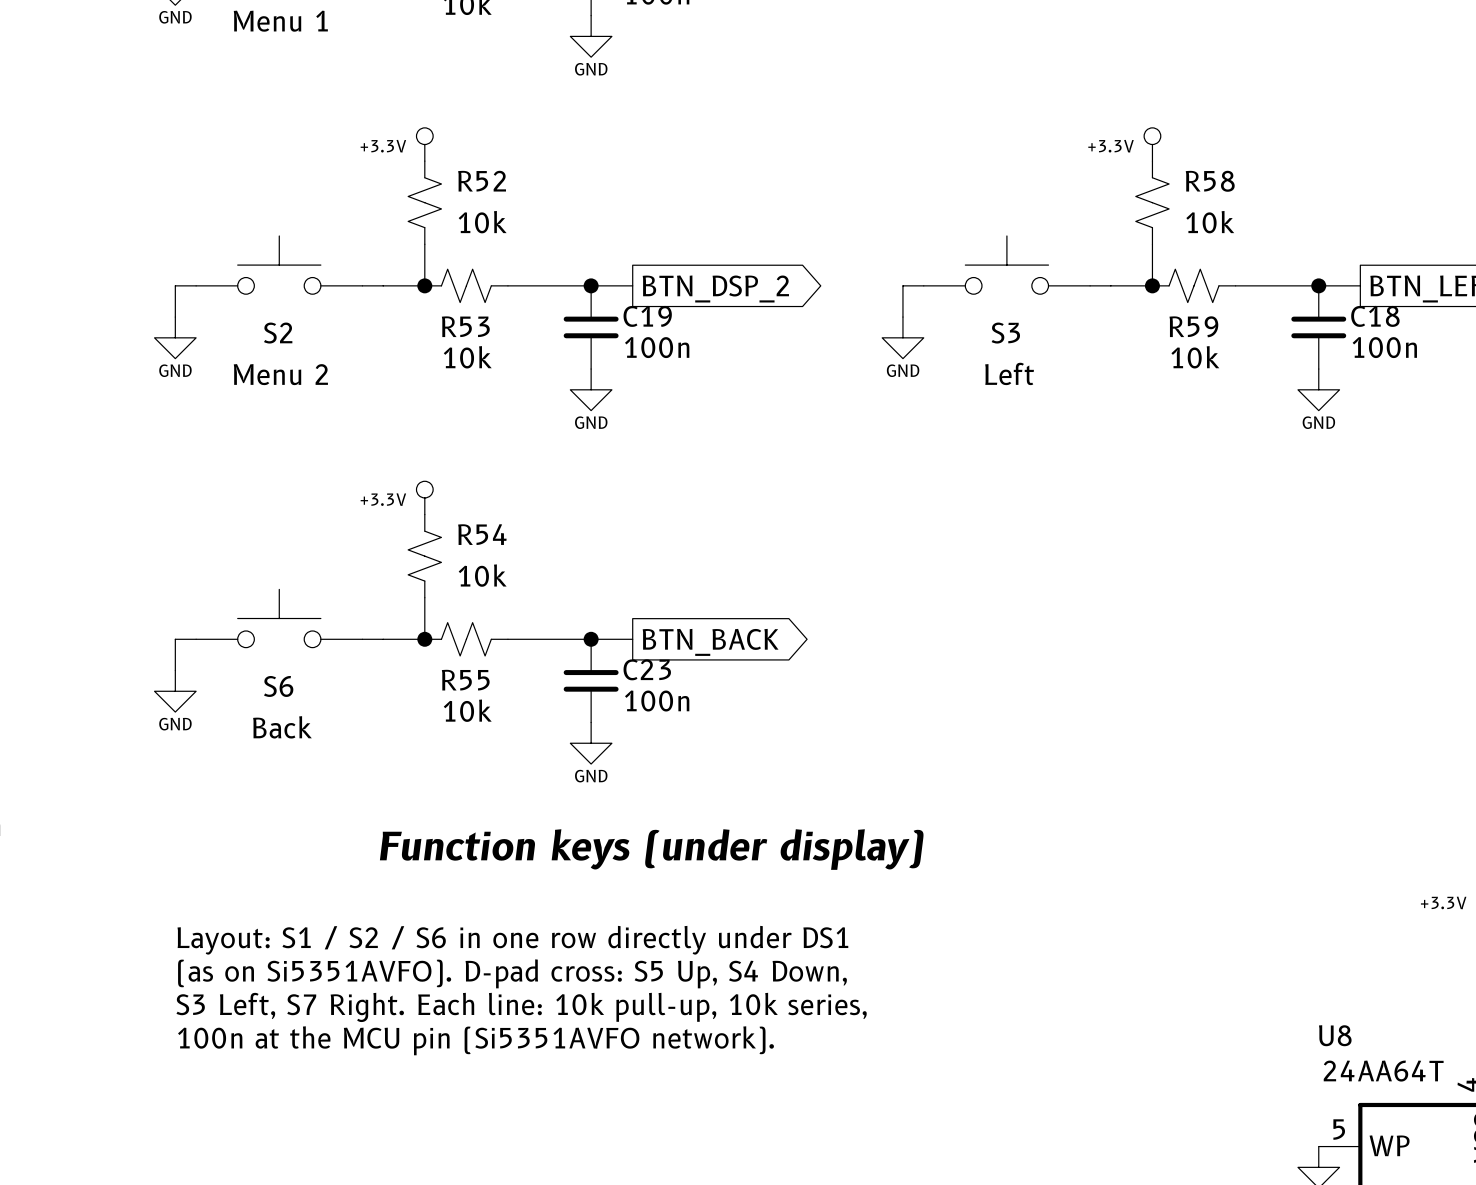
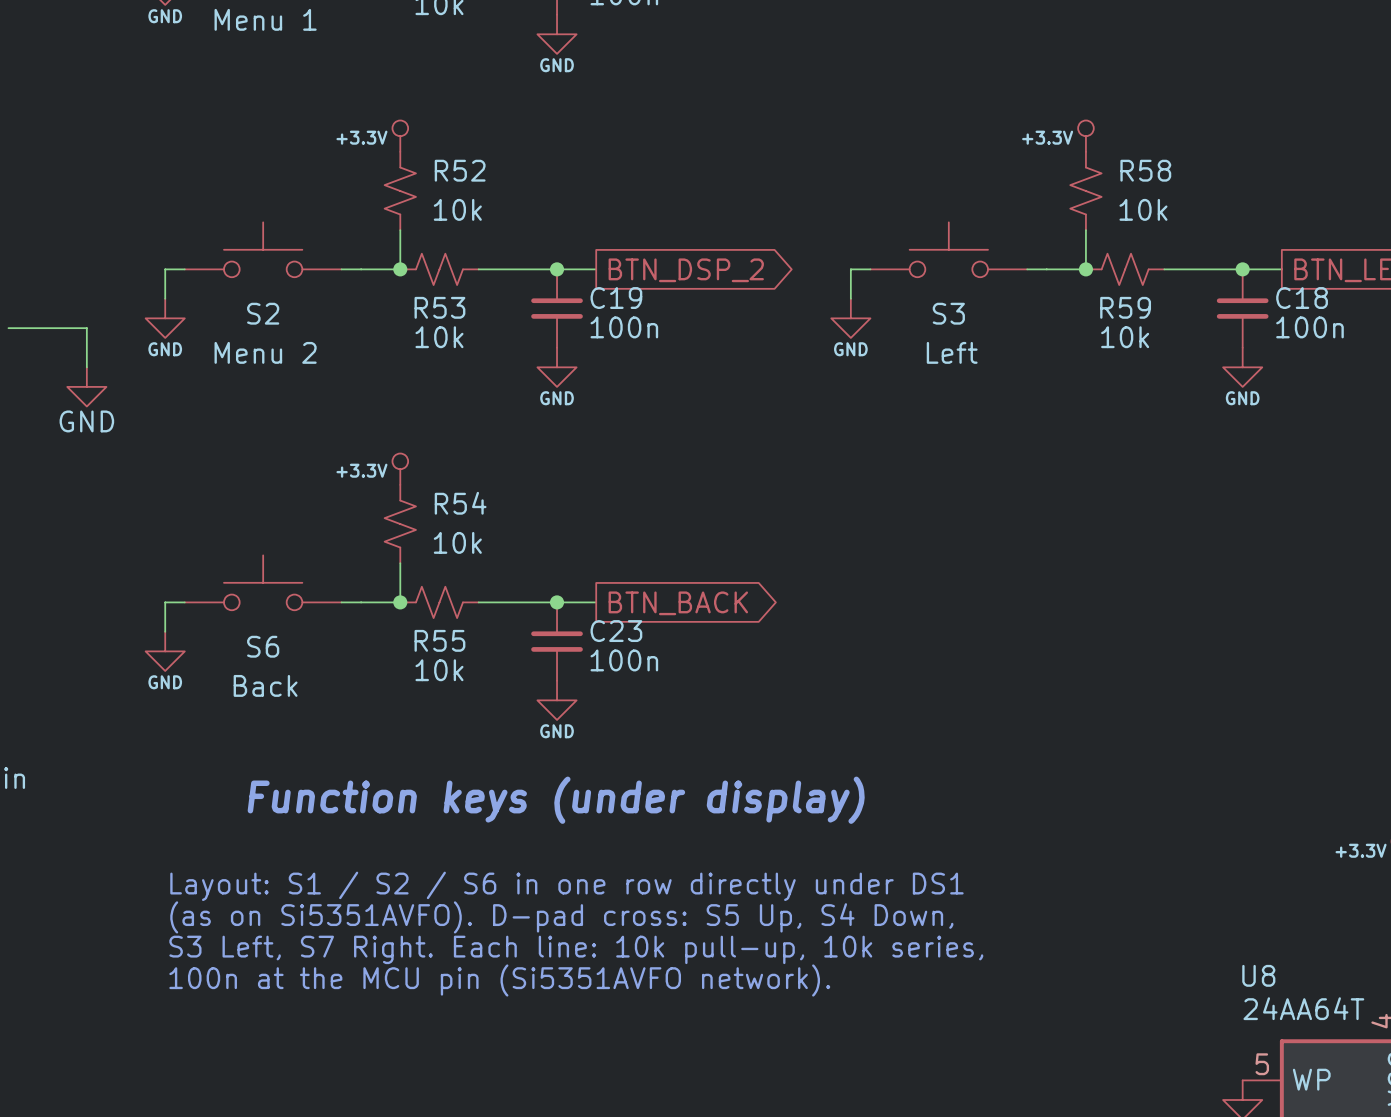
wire: none -> (8, 328) (86, 328) (86, 367)
power symbol: none -> GND (86, 386)

